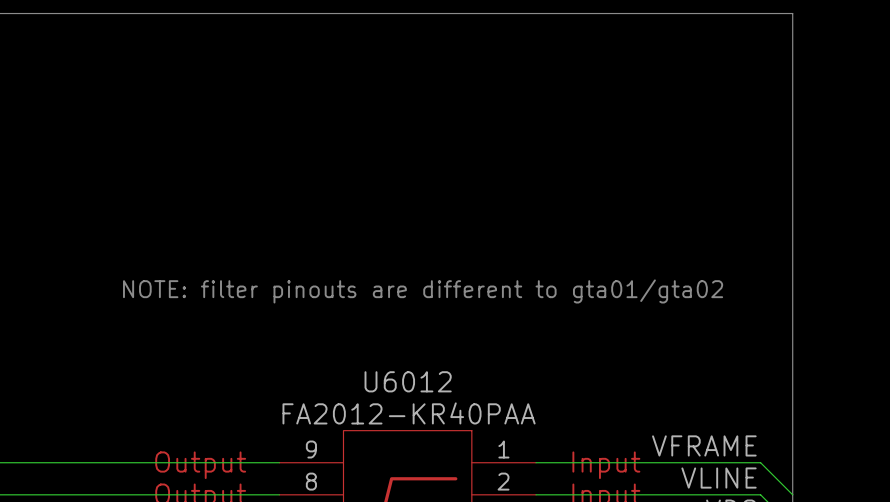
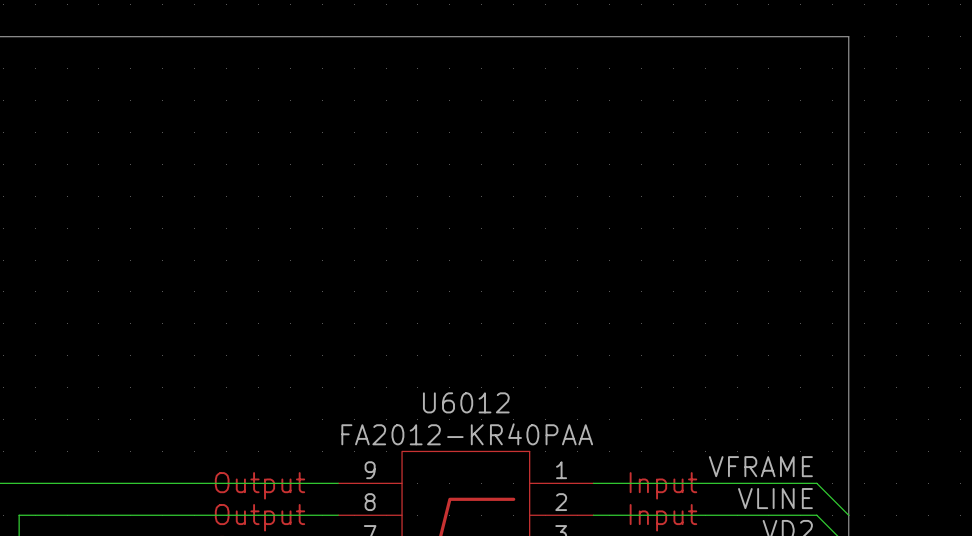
text: NOTE: filter pinouts are different to gta01/gta02 (423, 291) -> none

